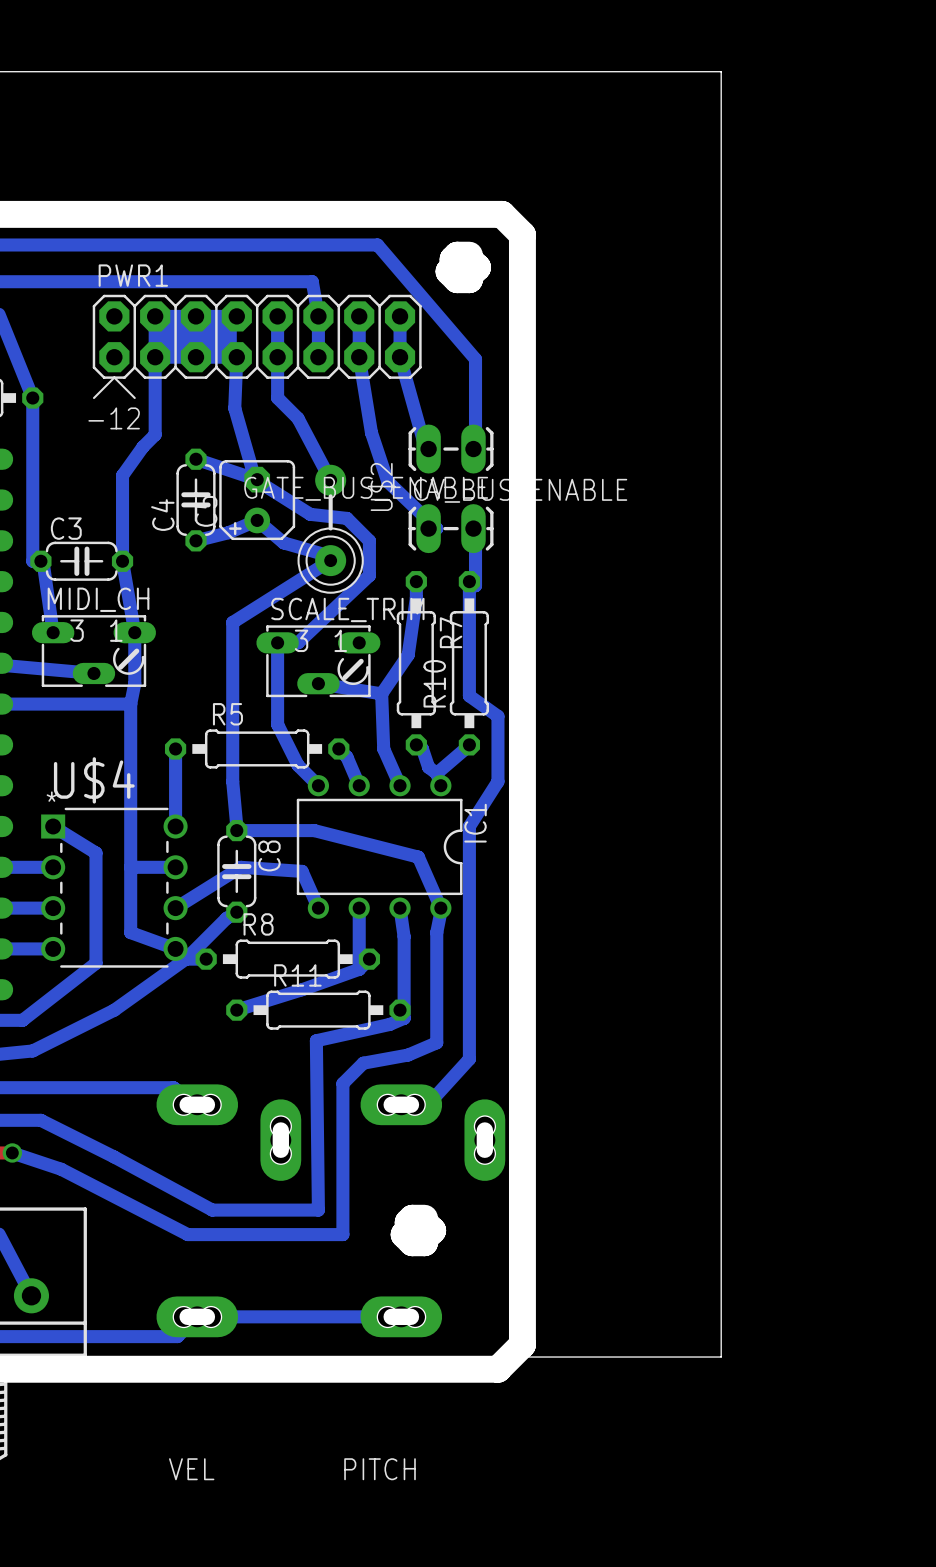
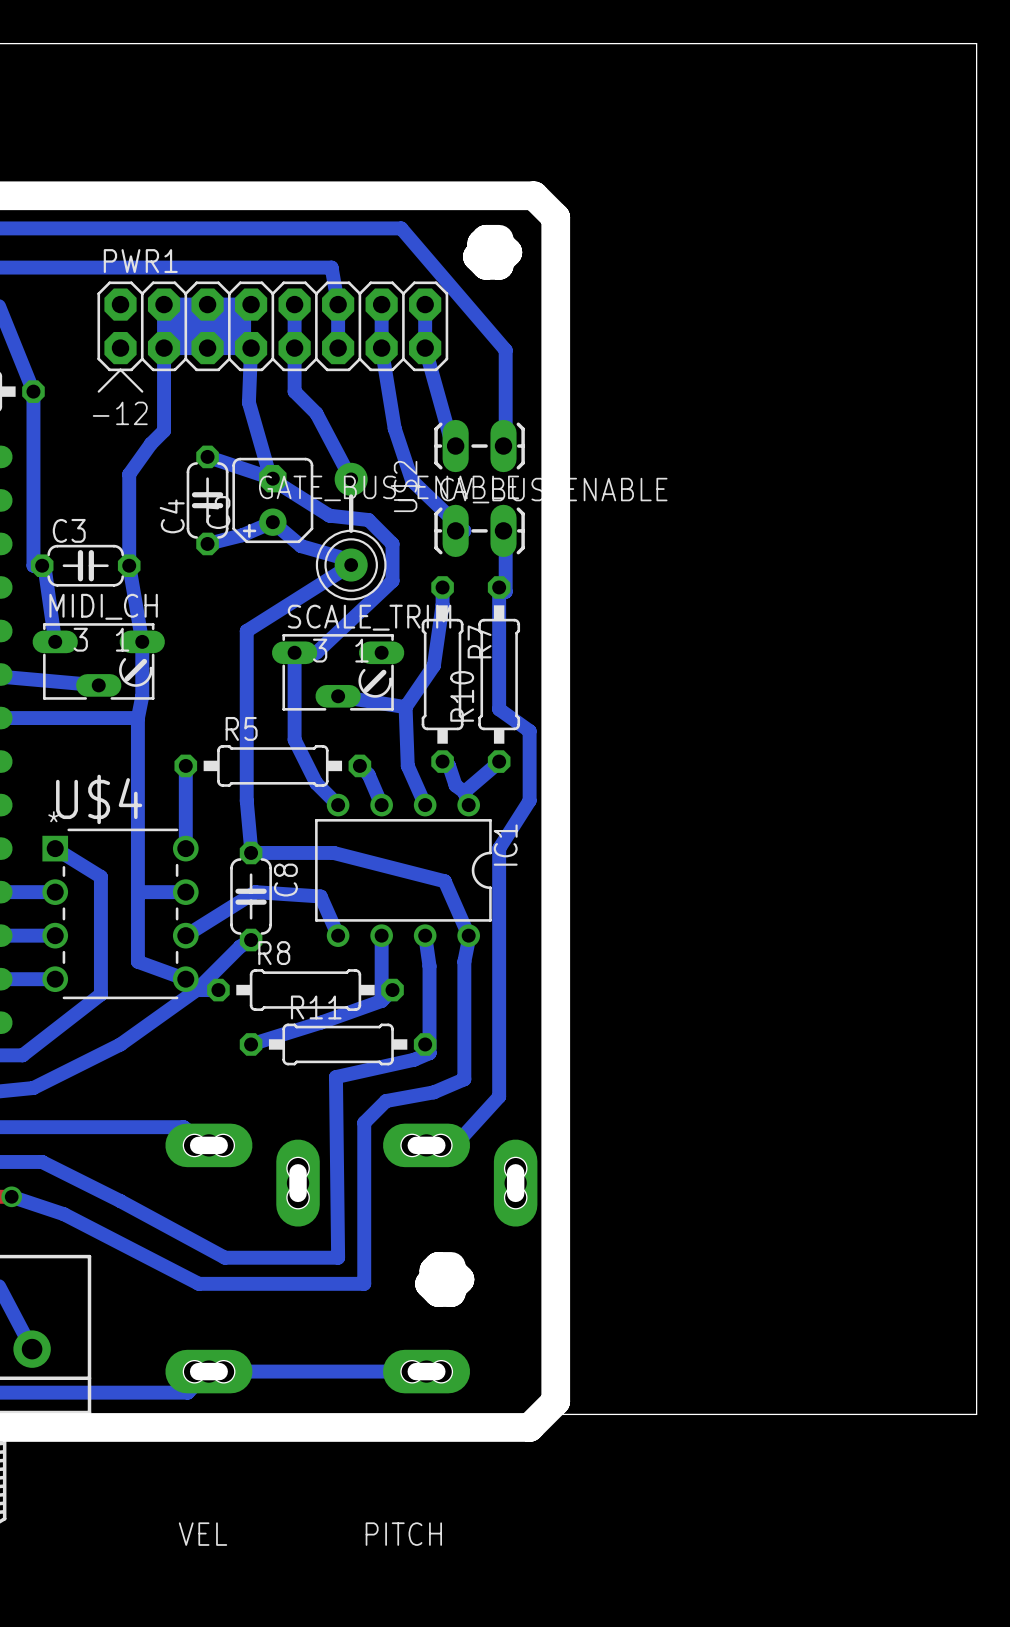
board edge: (721, 71) (721, 1357) -> (767, 43) (976, 43) (976, 1414) (767, 1414)

